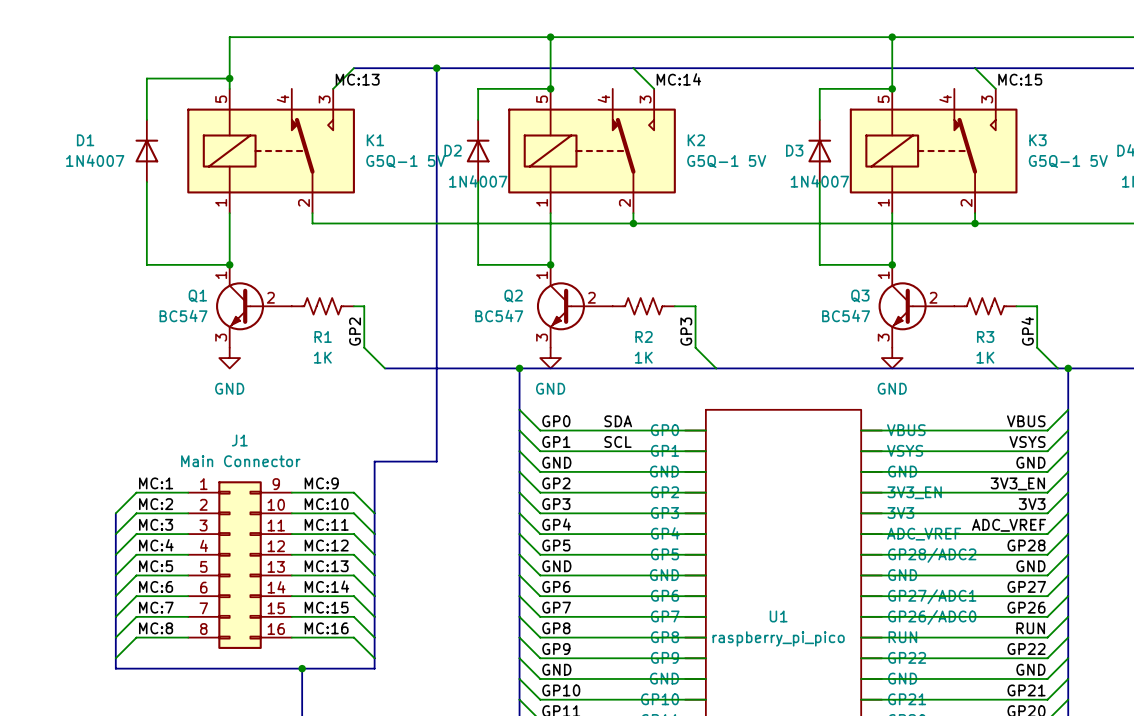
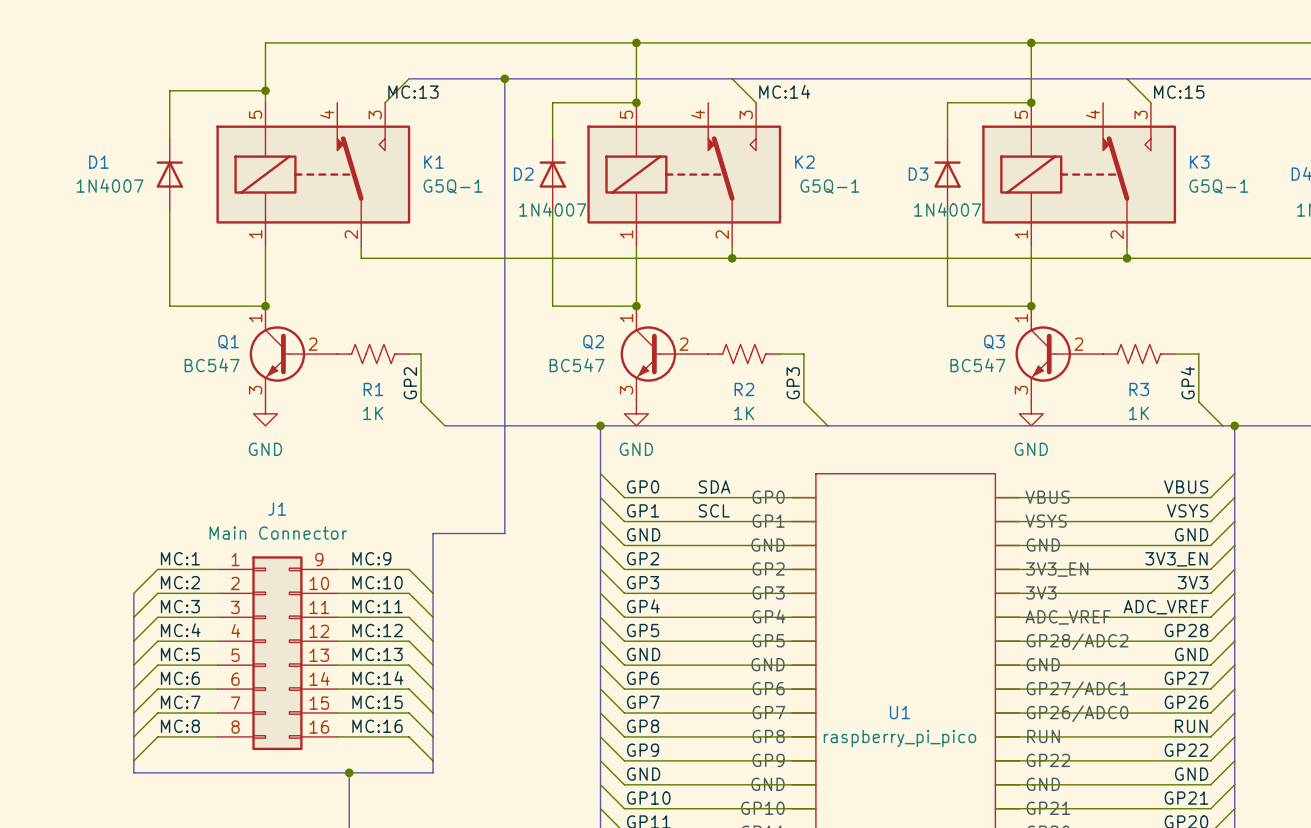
K1 value: G5Q-1 5V (405, 161) -> G5Q-1 (453, 186)
K2 value: G5Q-1 5V (726, 161) -> G5Q-1 (829, 186)
K3 value: G5Q-1 5V (1068, 161) -> G5Q-1 (1218, 186)

